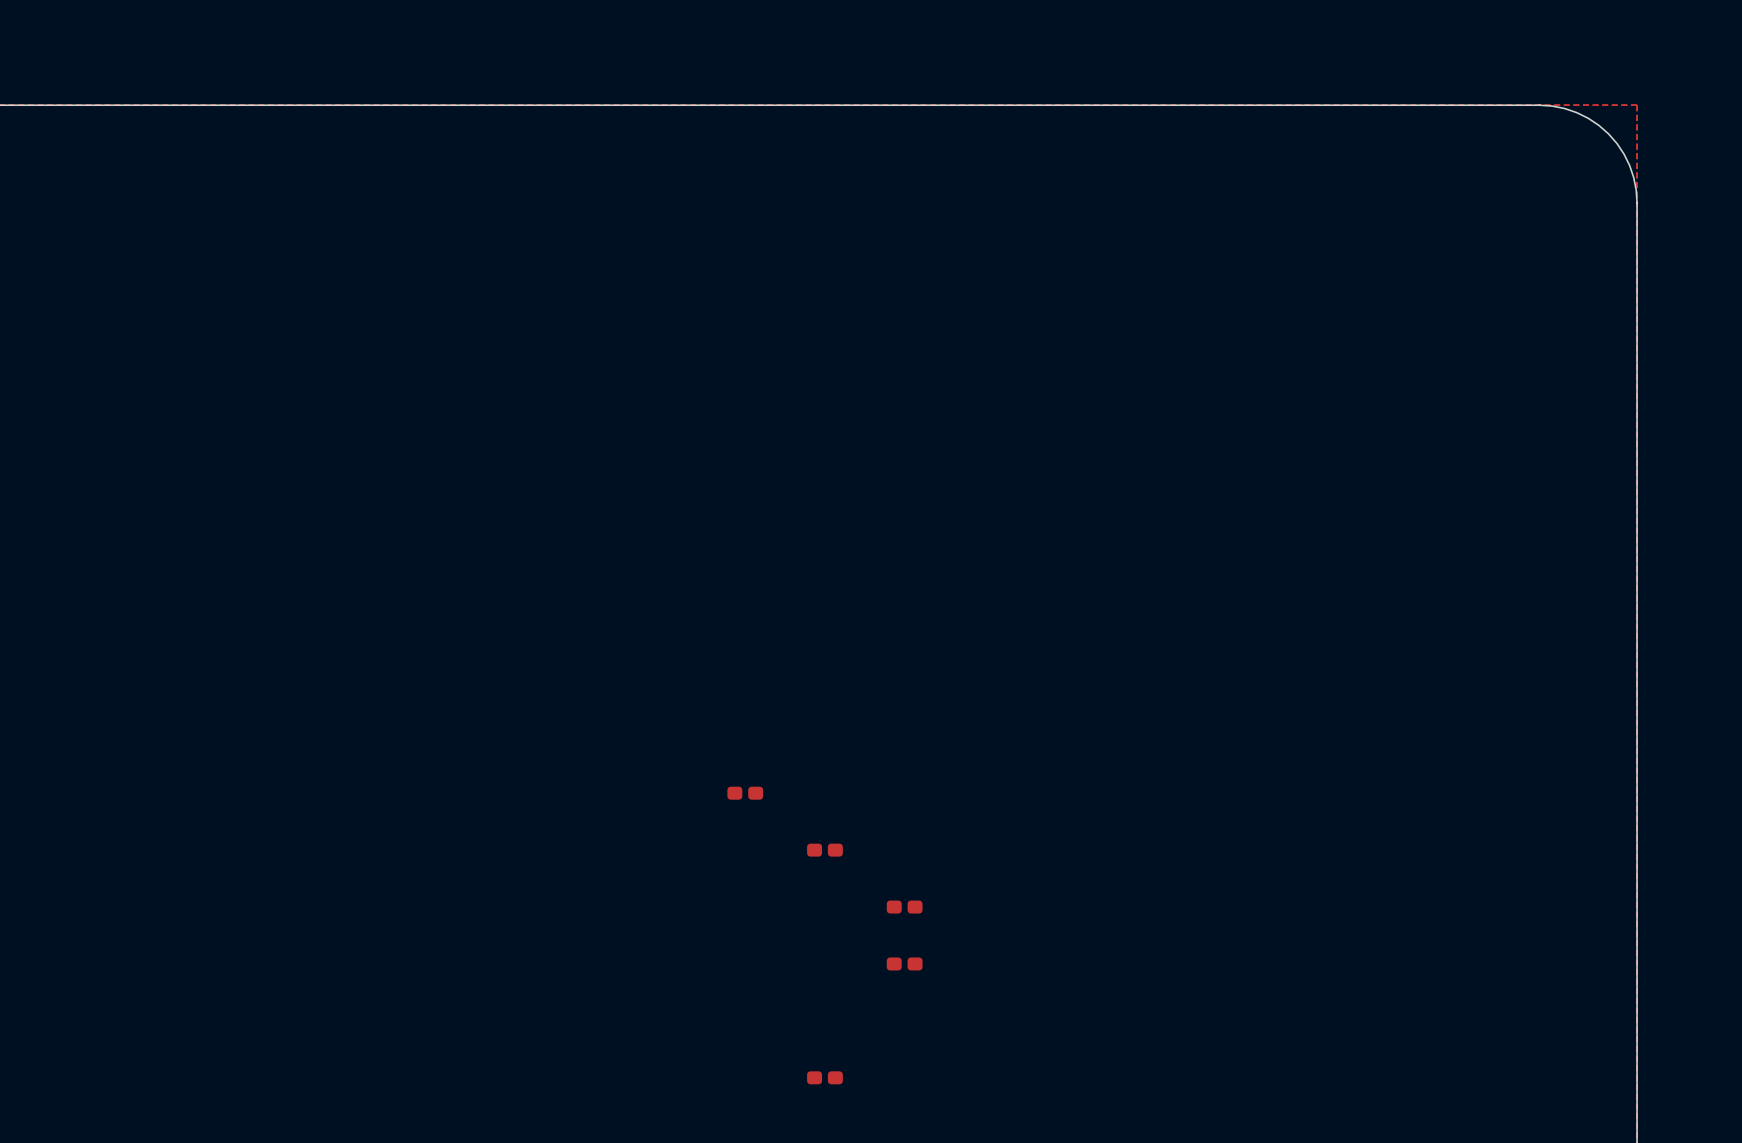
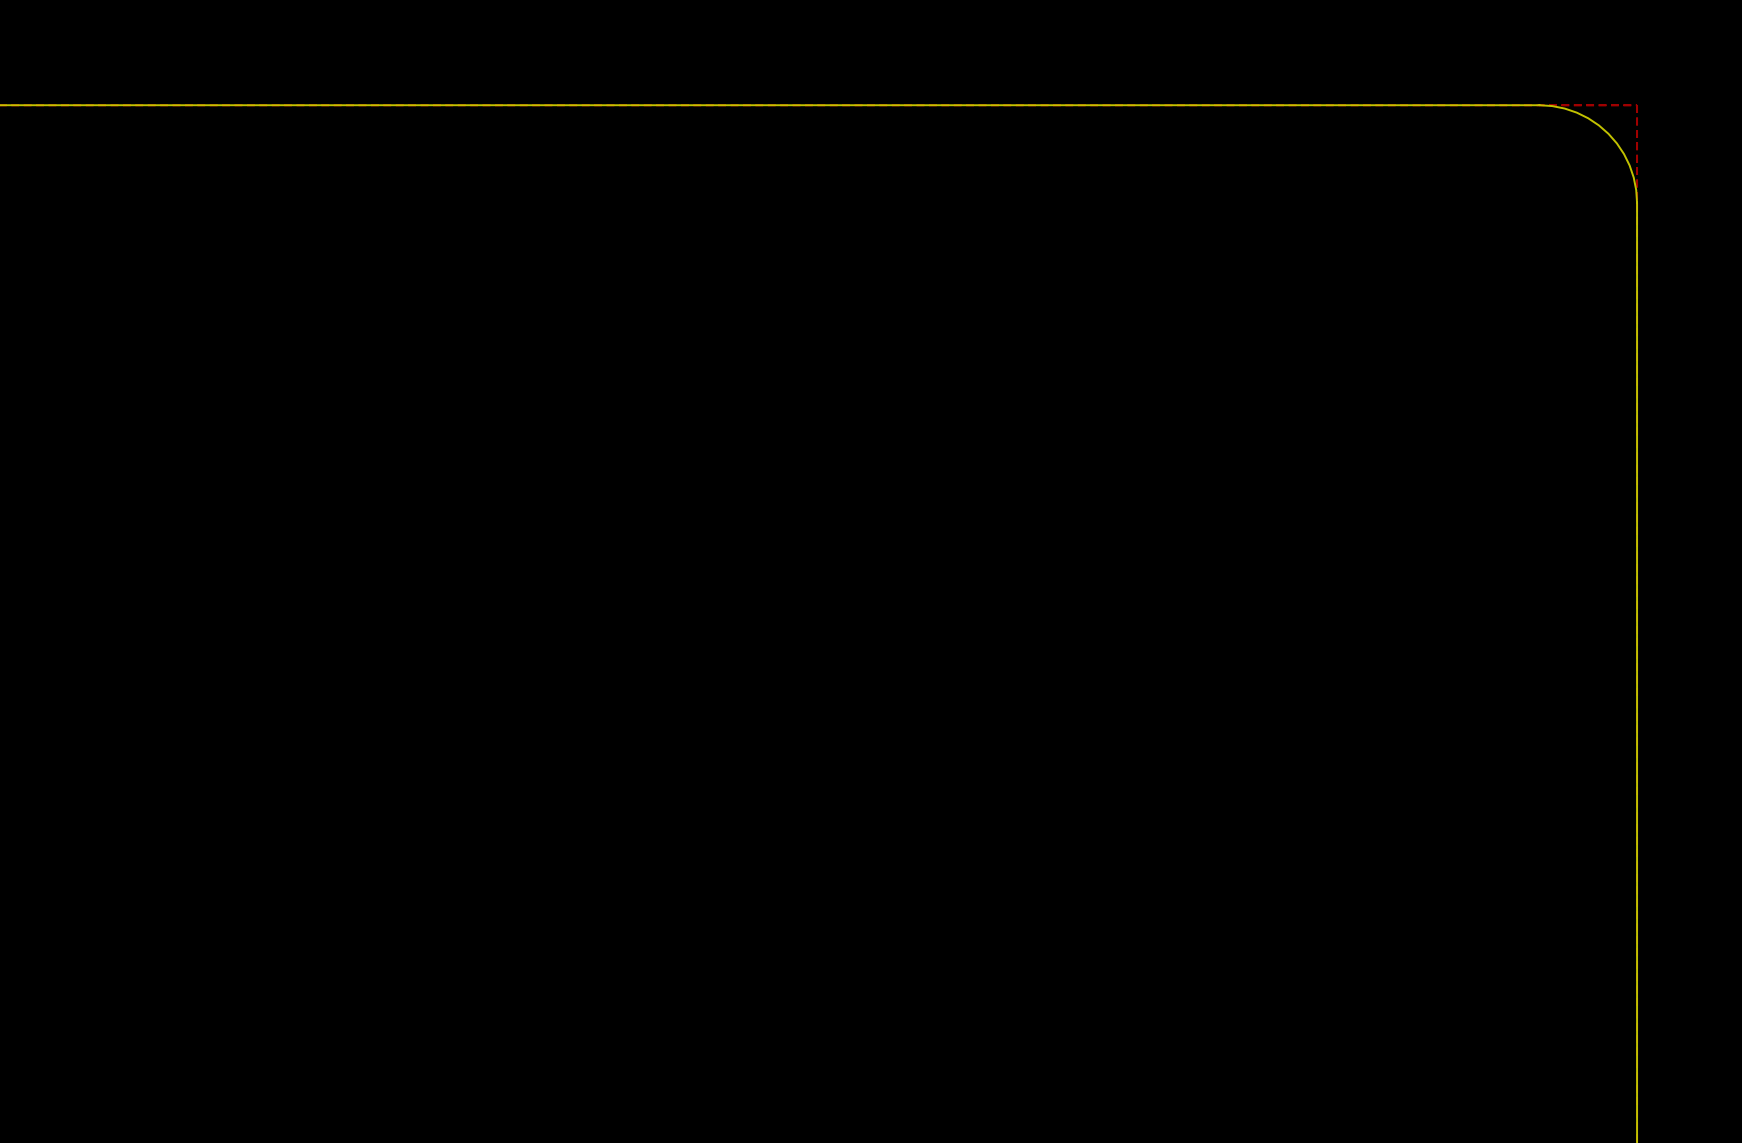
part: (745, 793) -> none
part: (824, 850) -> none
part: (904, 907) -> none
part: (904, 963) -> none
part: (824, 1077) -> none

